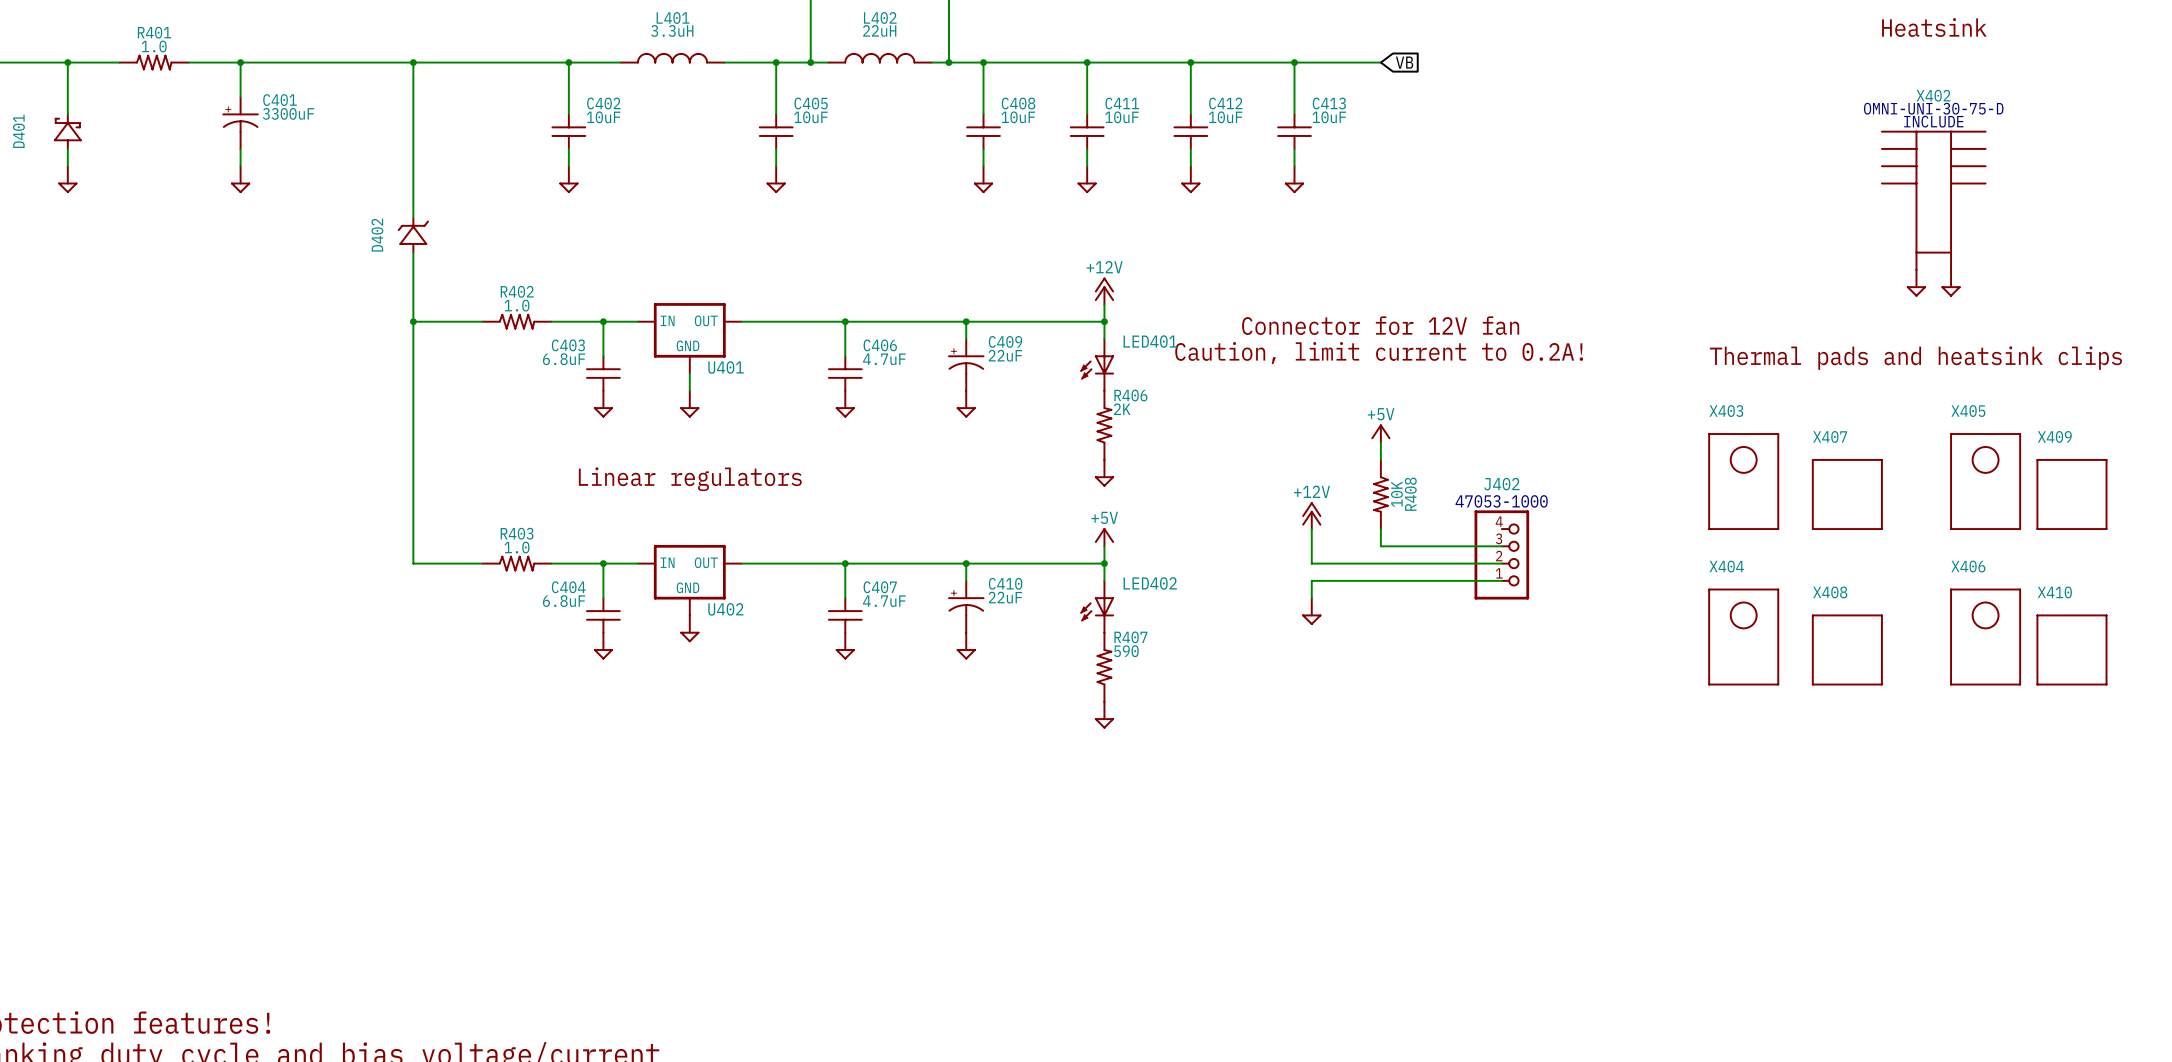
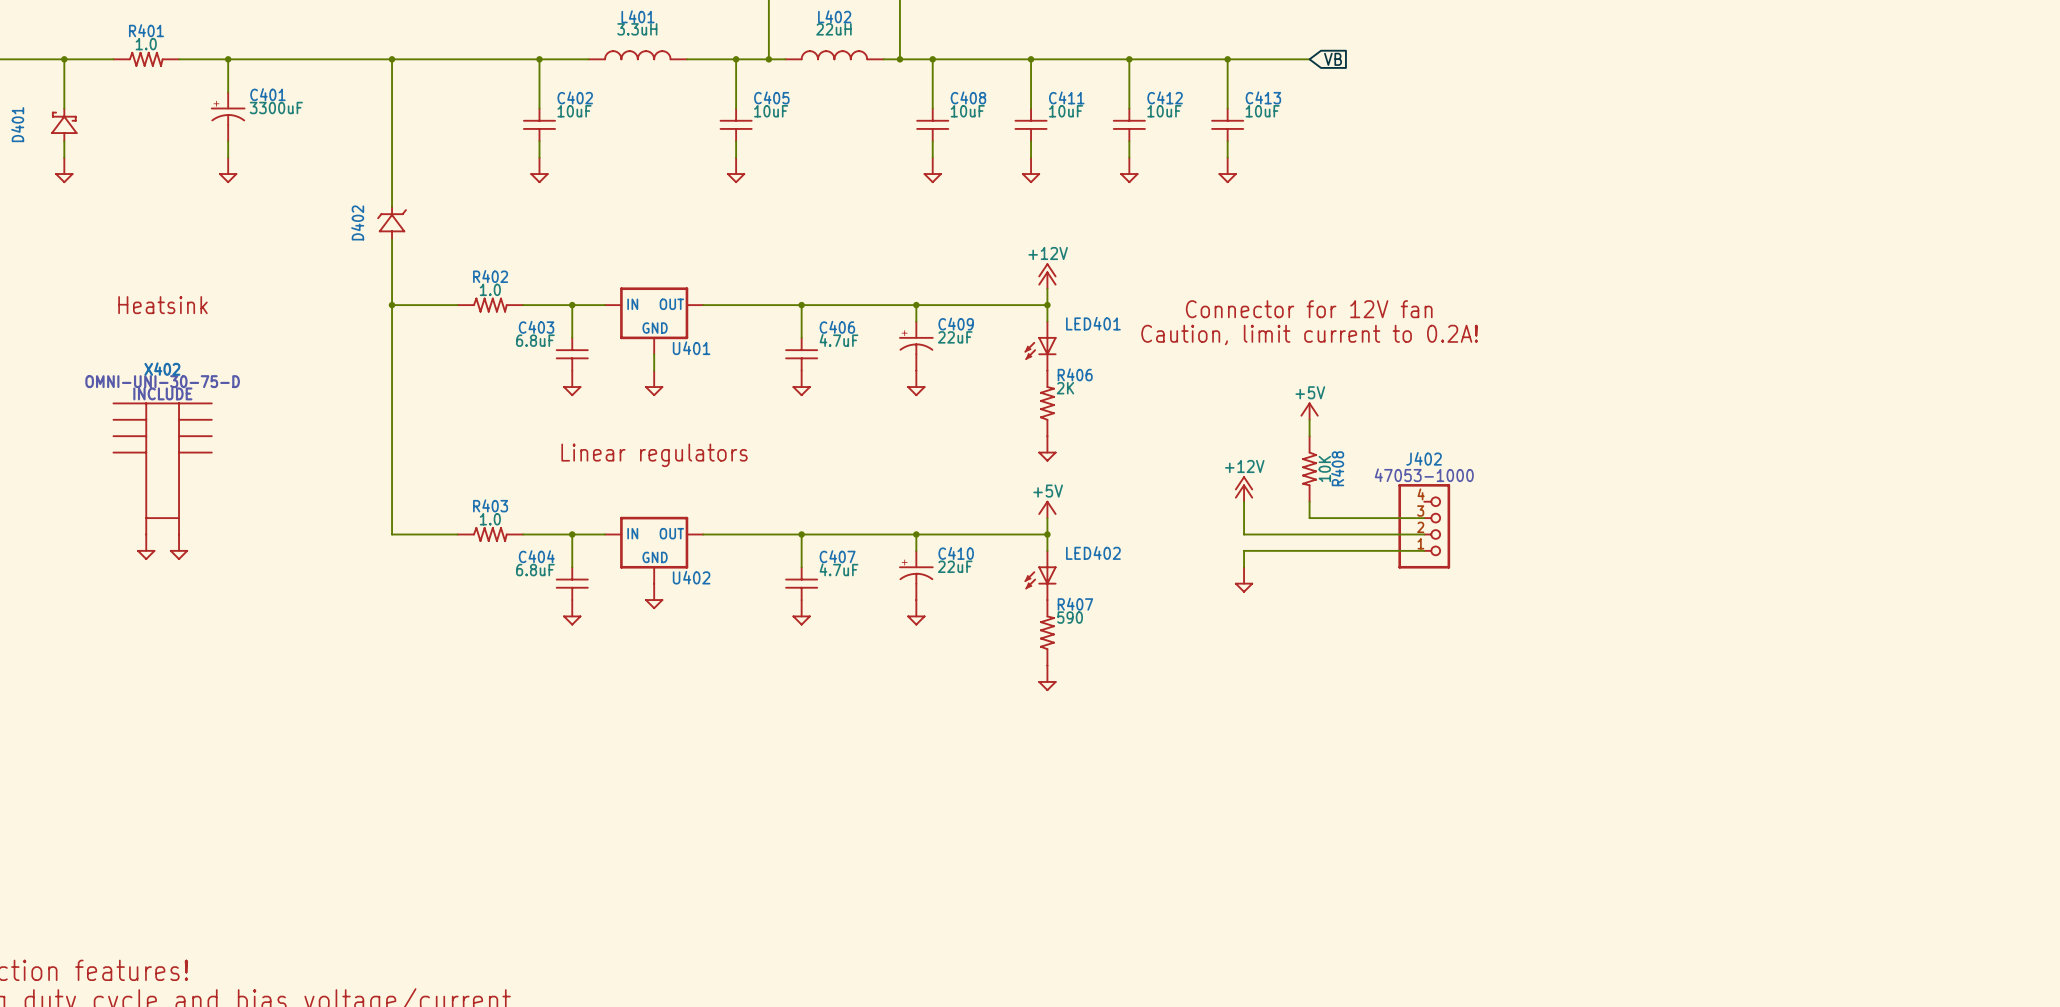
text: Heatsink (1934, 27) -> none
X402 position: (1933, 200) -> (162, 468)
power symbol: (1916, 283) -> none
power symbol: (1951, 283) -> none
text: none -> Heatsink (162, 305)
text: Thermal pads and heatsink clips (1915, 358) -> none
X403: (1743, 481) -> none
X405: (1985, 481) -> none
X407: (1847, 494) -> none
X409: (2071, 494) -> none
power symbol: none -> (146, 547)
power symbol: none -> (179, 547)
X404: (1743, 637) -> none
X406: (1985, 637) -> none
X408: (1847, 649) -> none
X410: (2071, 649) -> none

